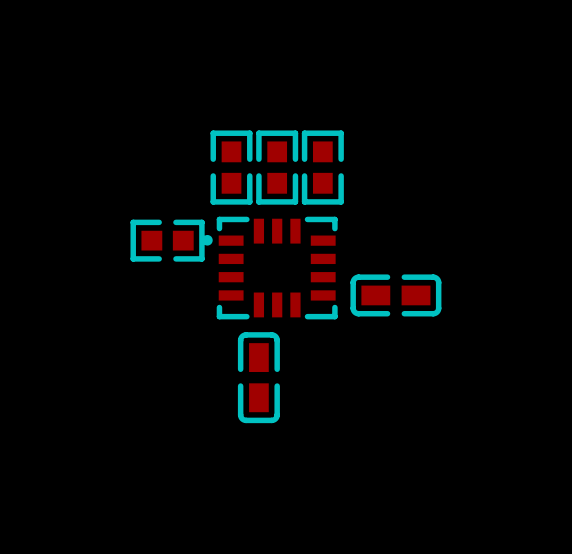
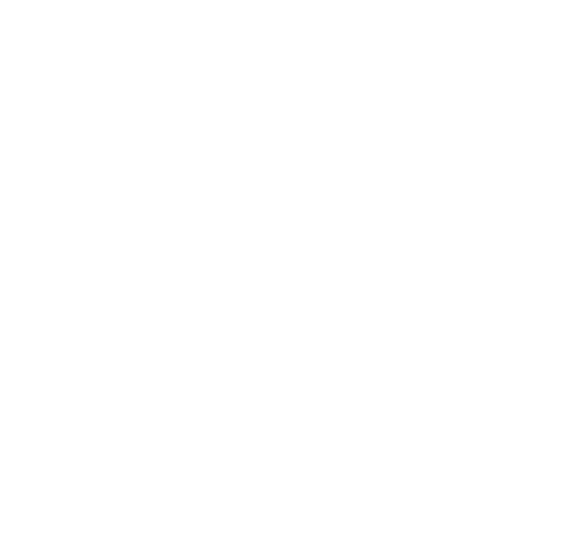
part: (231, 167) -> none
part: (277, 167) -> none
part: (322, 167) -> none
part: (167, 240) -> none
part: (269, 268) -> none
part: (395, 295) -> none
part: (258, 377) -> none

